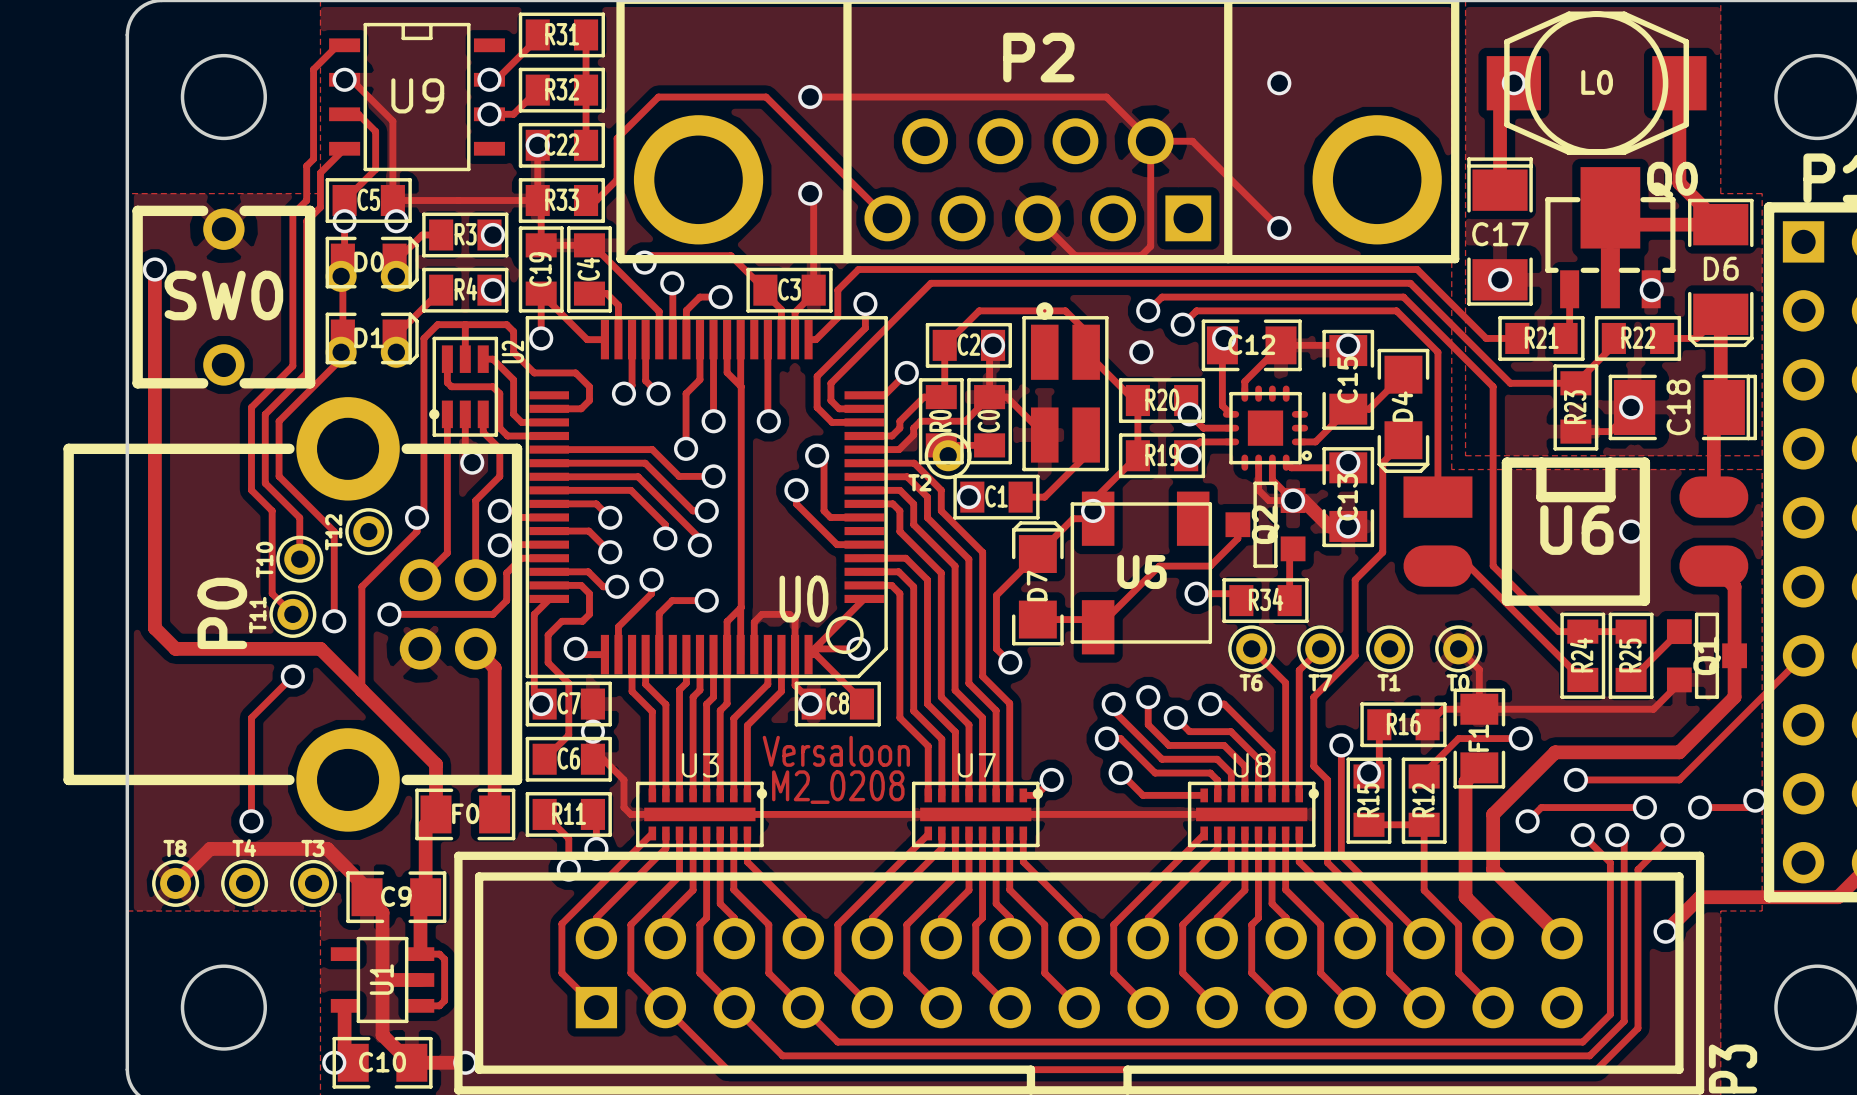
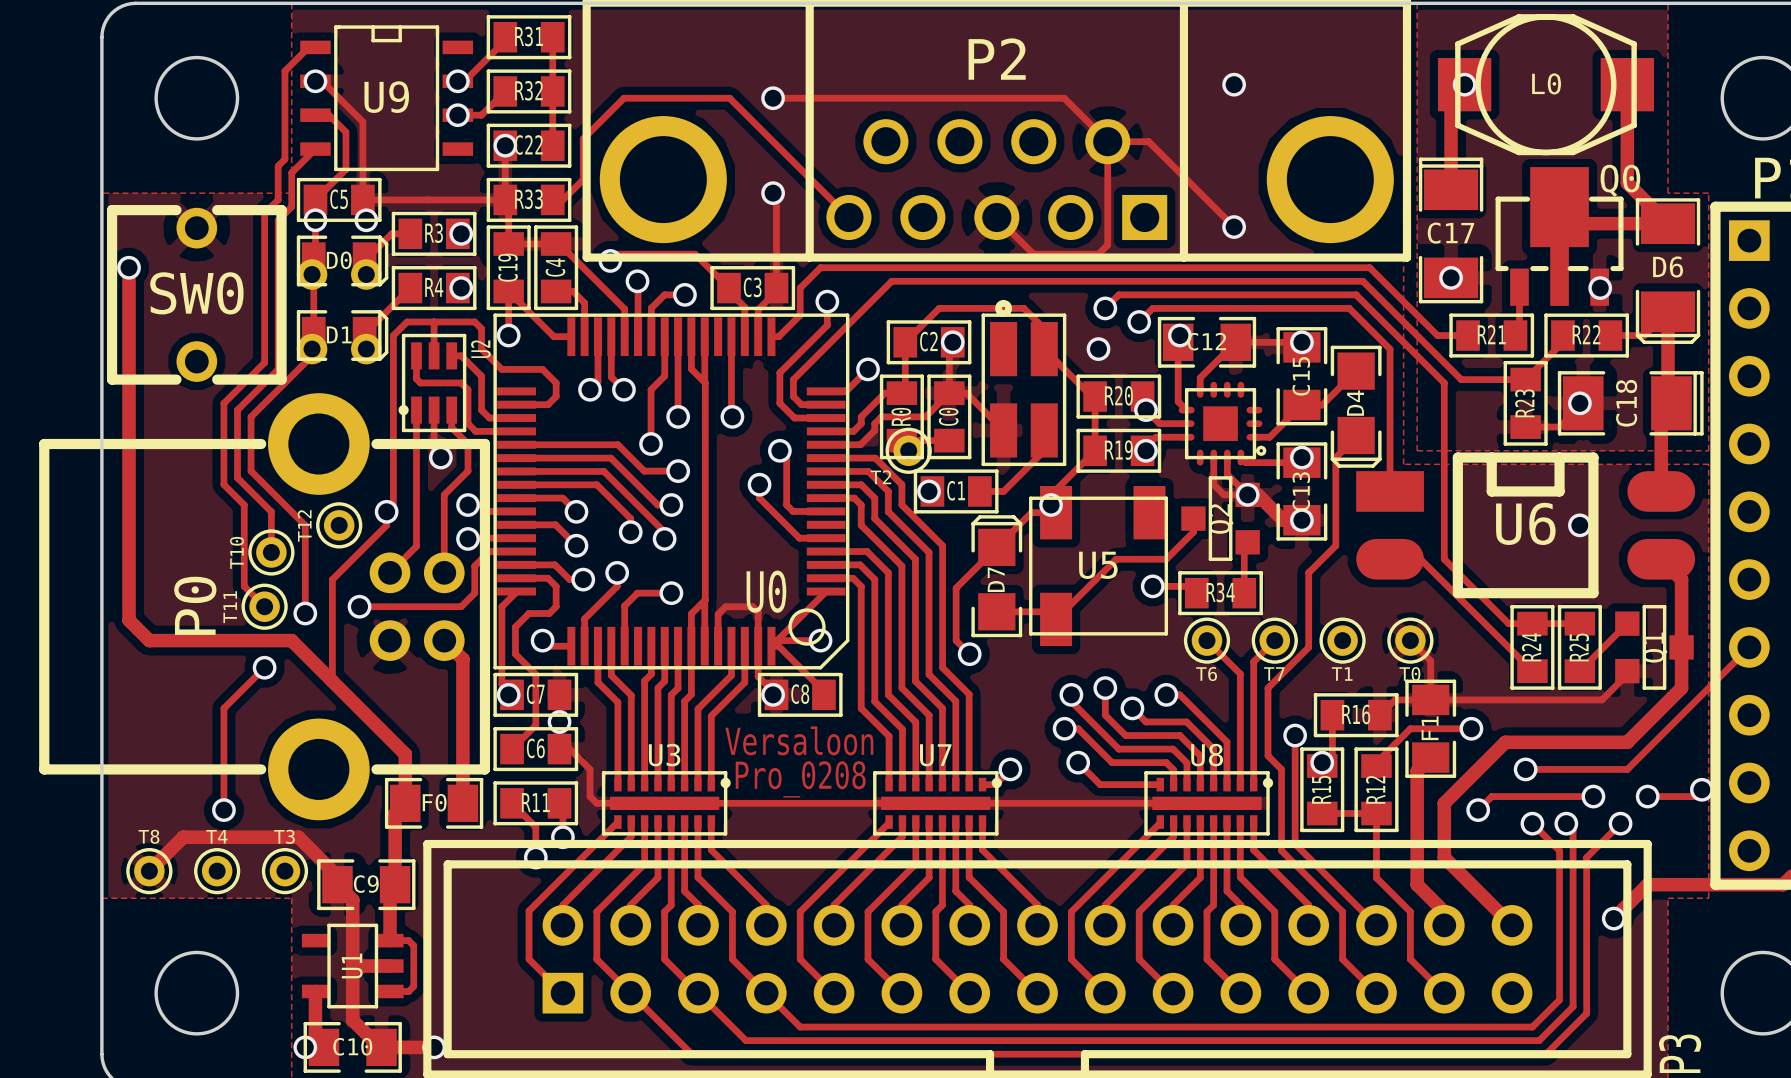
text: M2_0208 (838, 787) -> Pro_0208 (800, 779)

